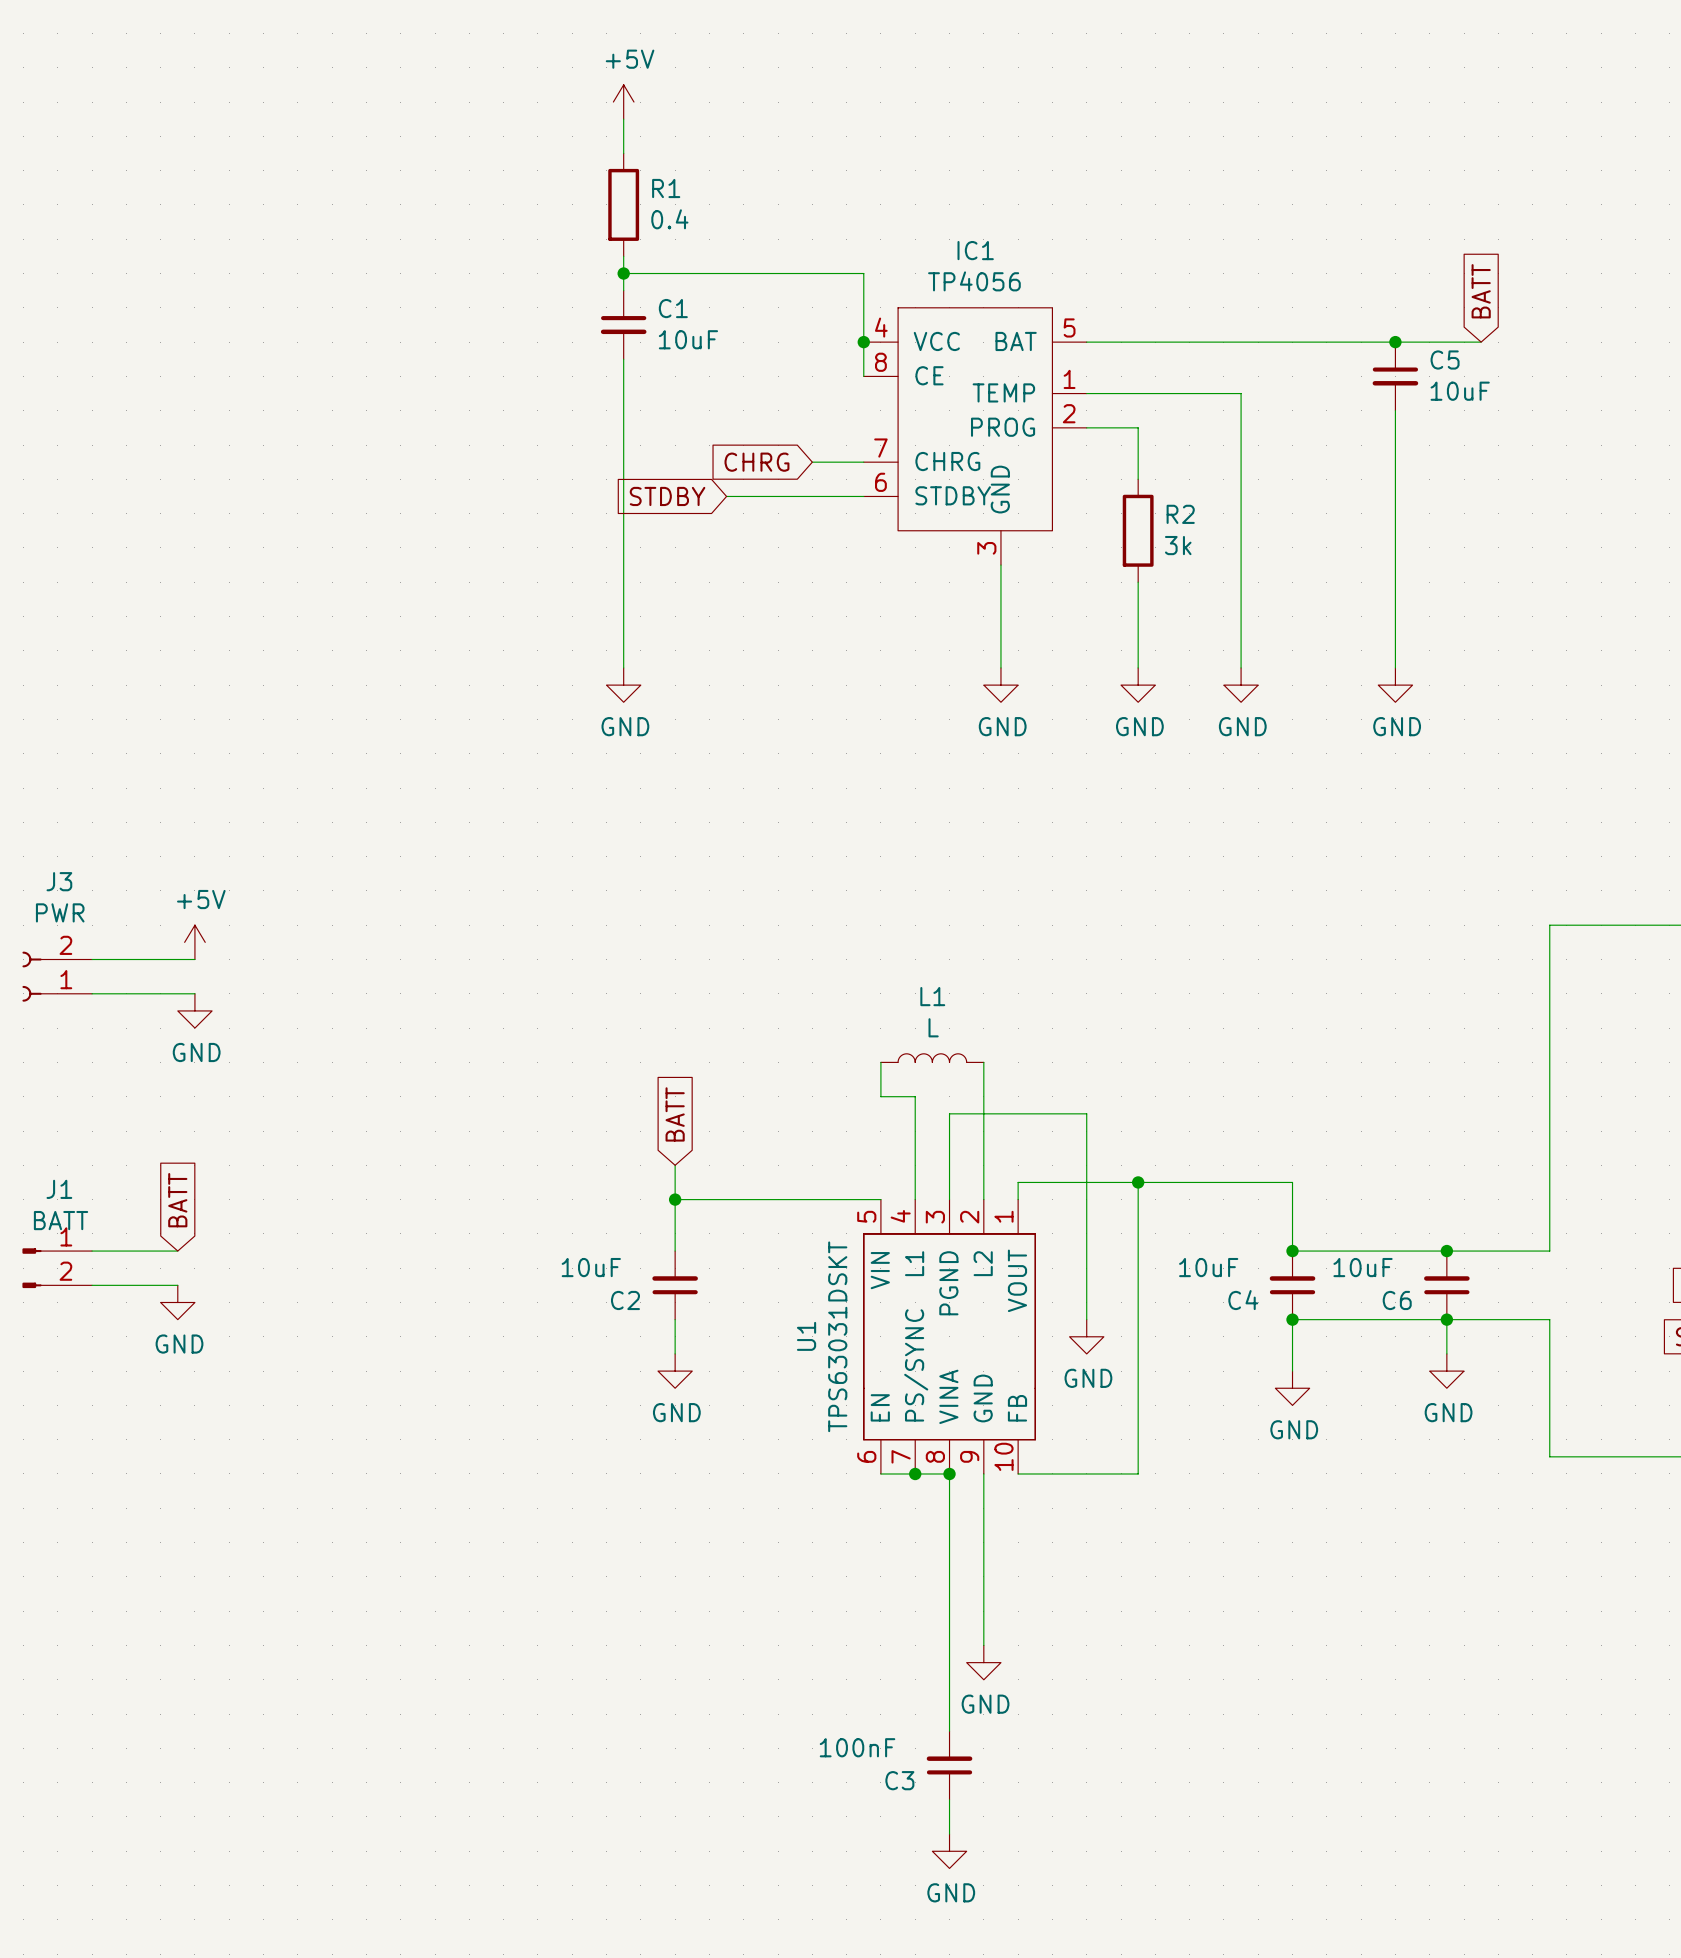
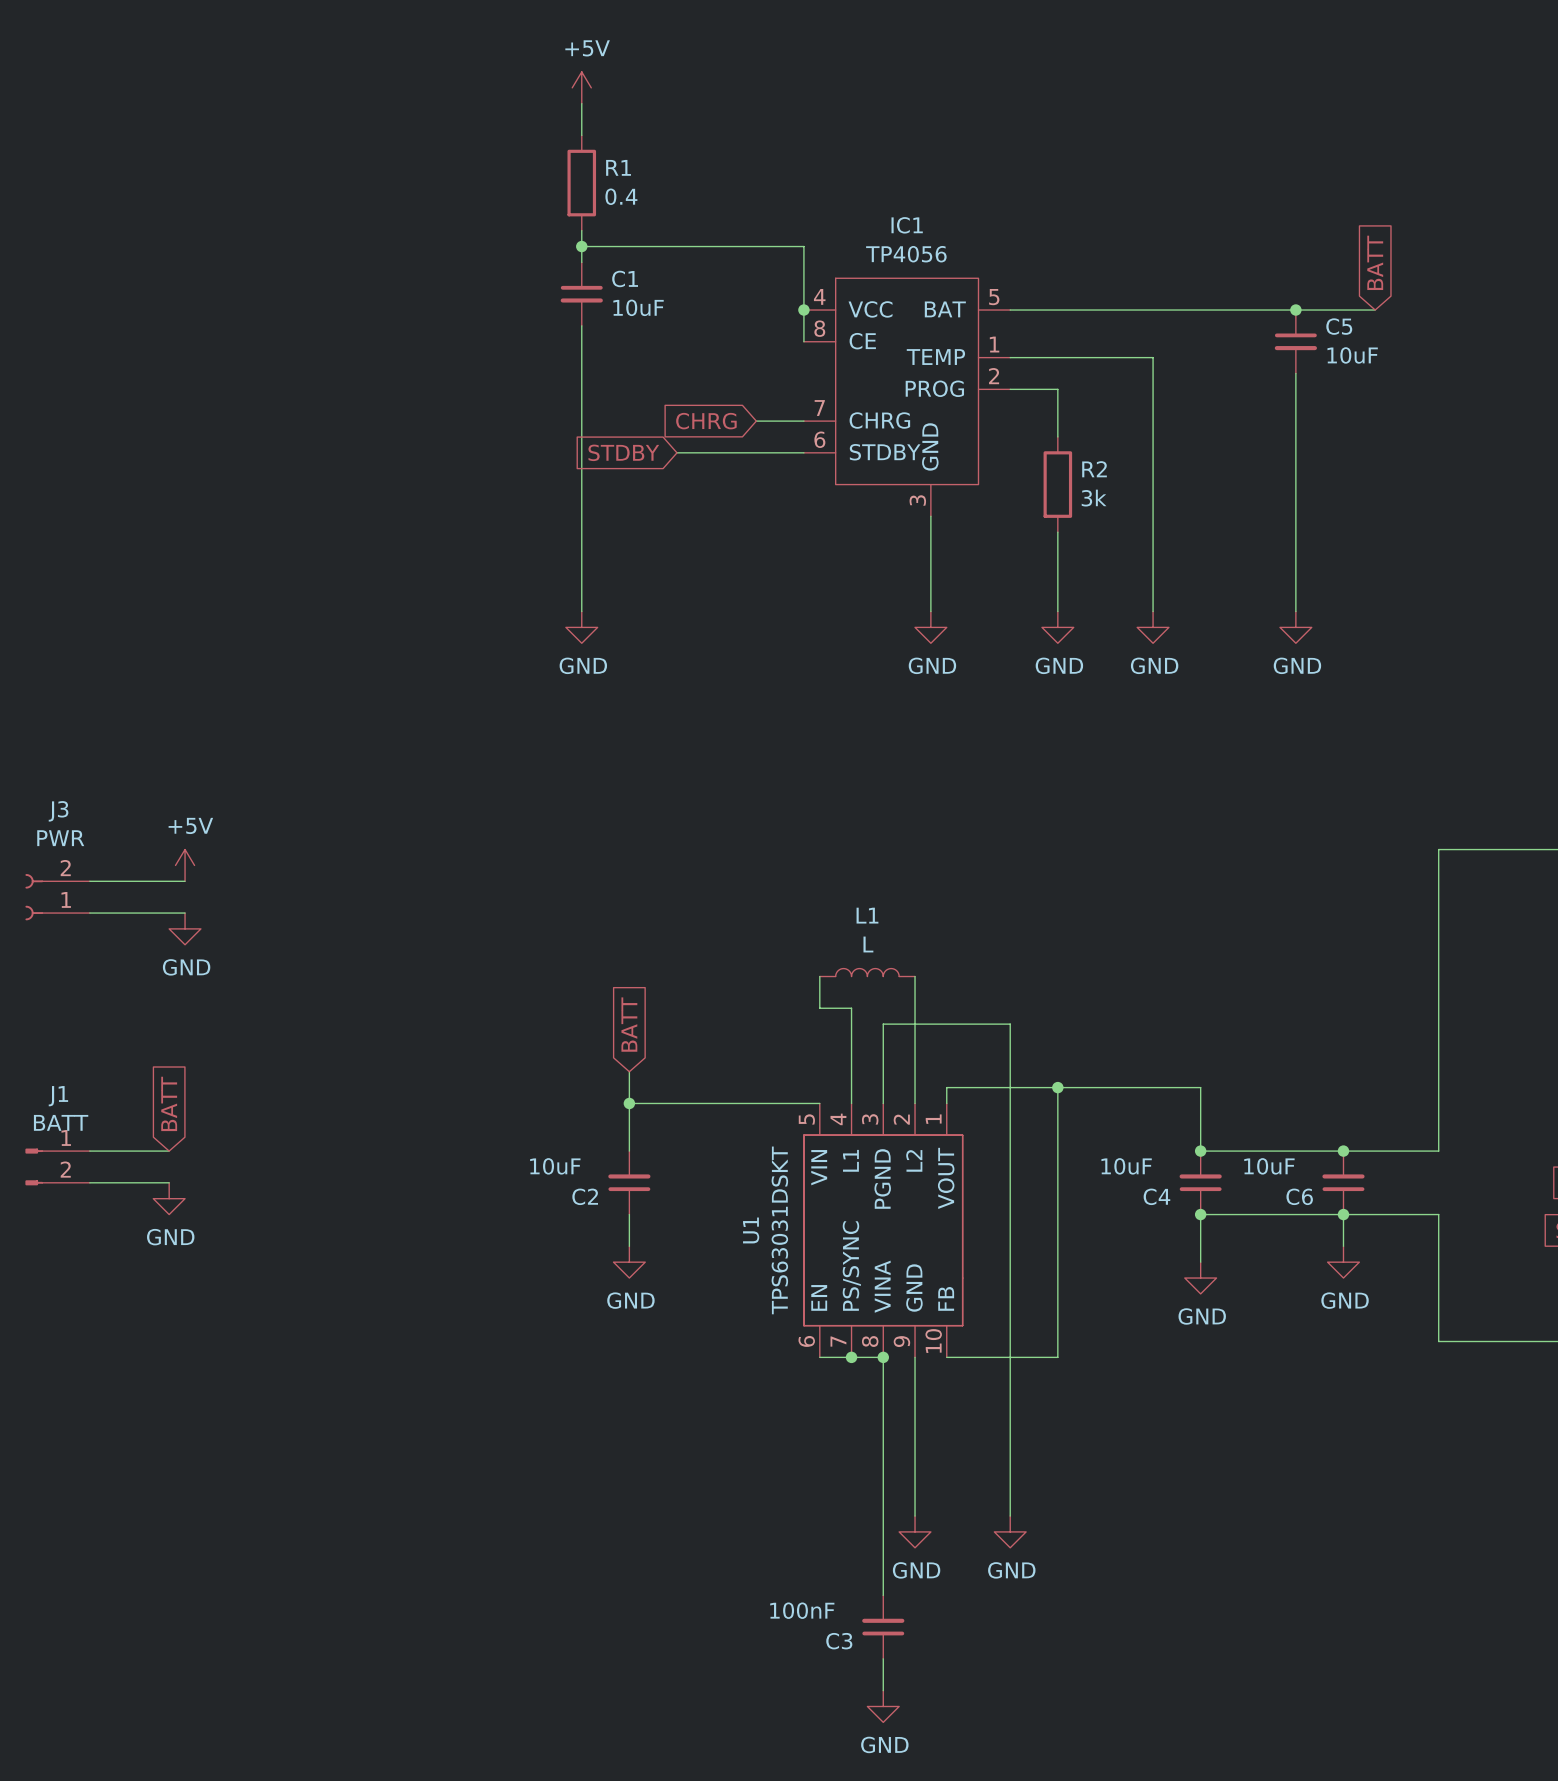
wire: none -> (1010, 1214) (1010, 1516)
power symbol position: GND (1086, 1336) -> GND (1010, 1531)

